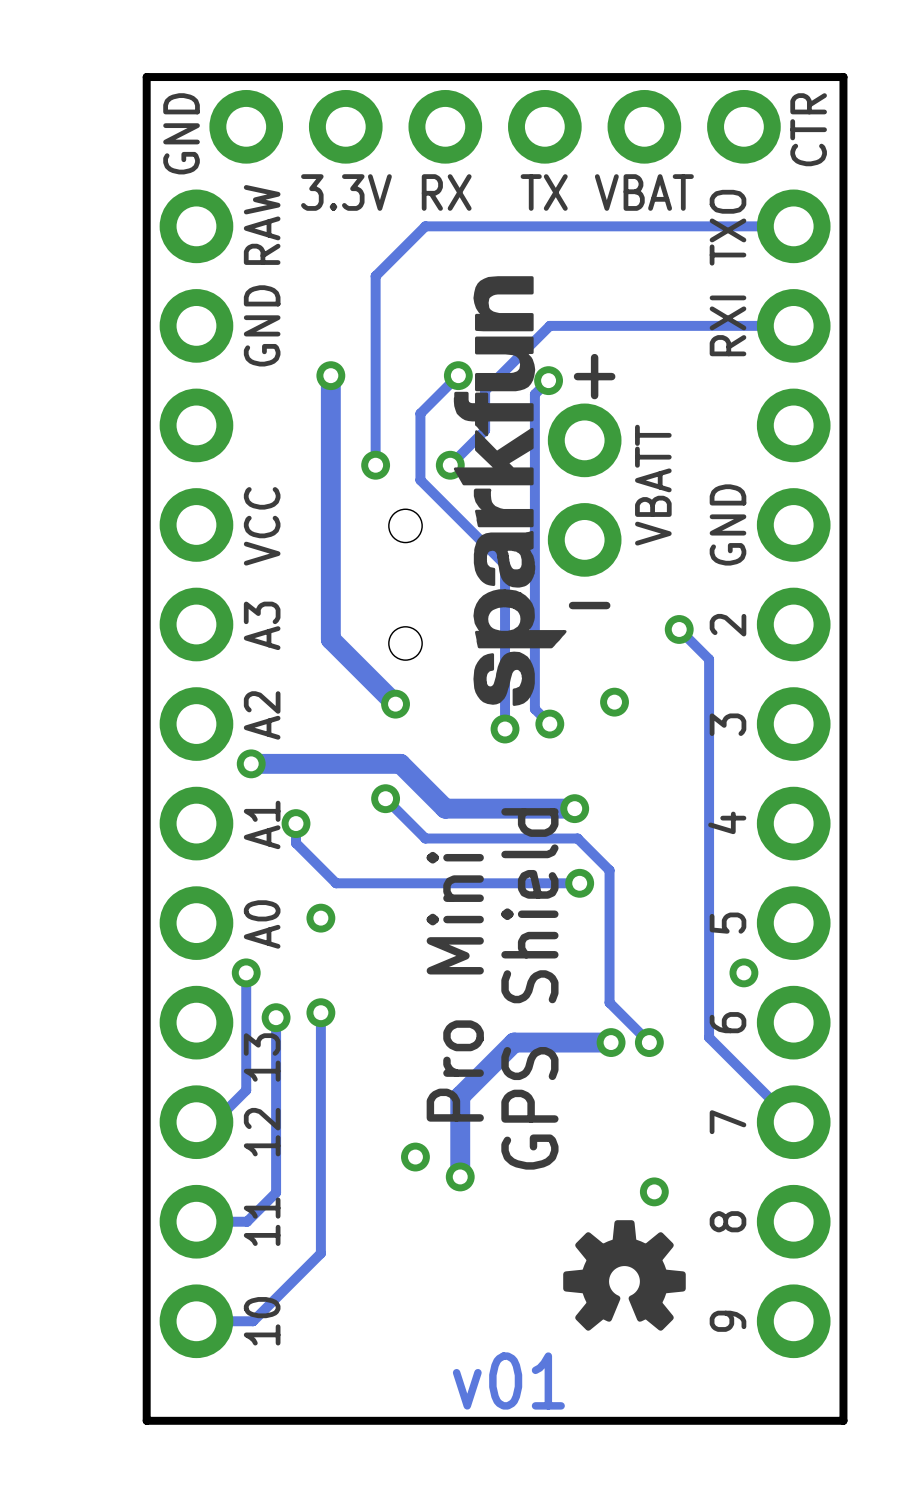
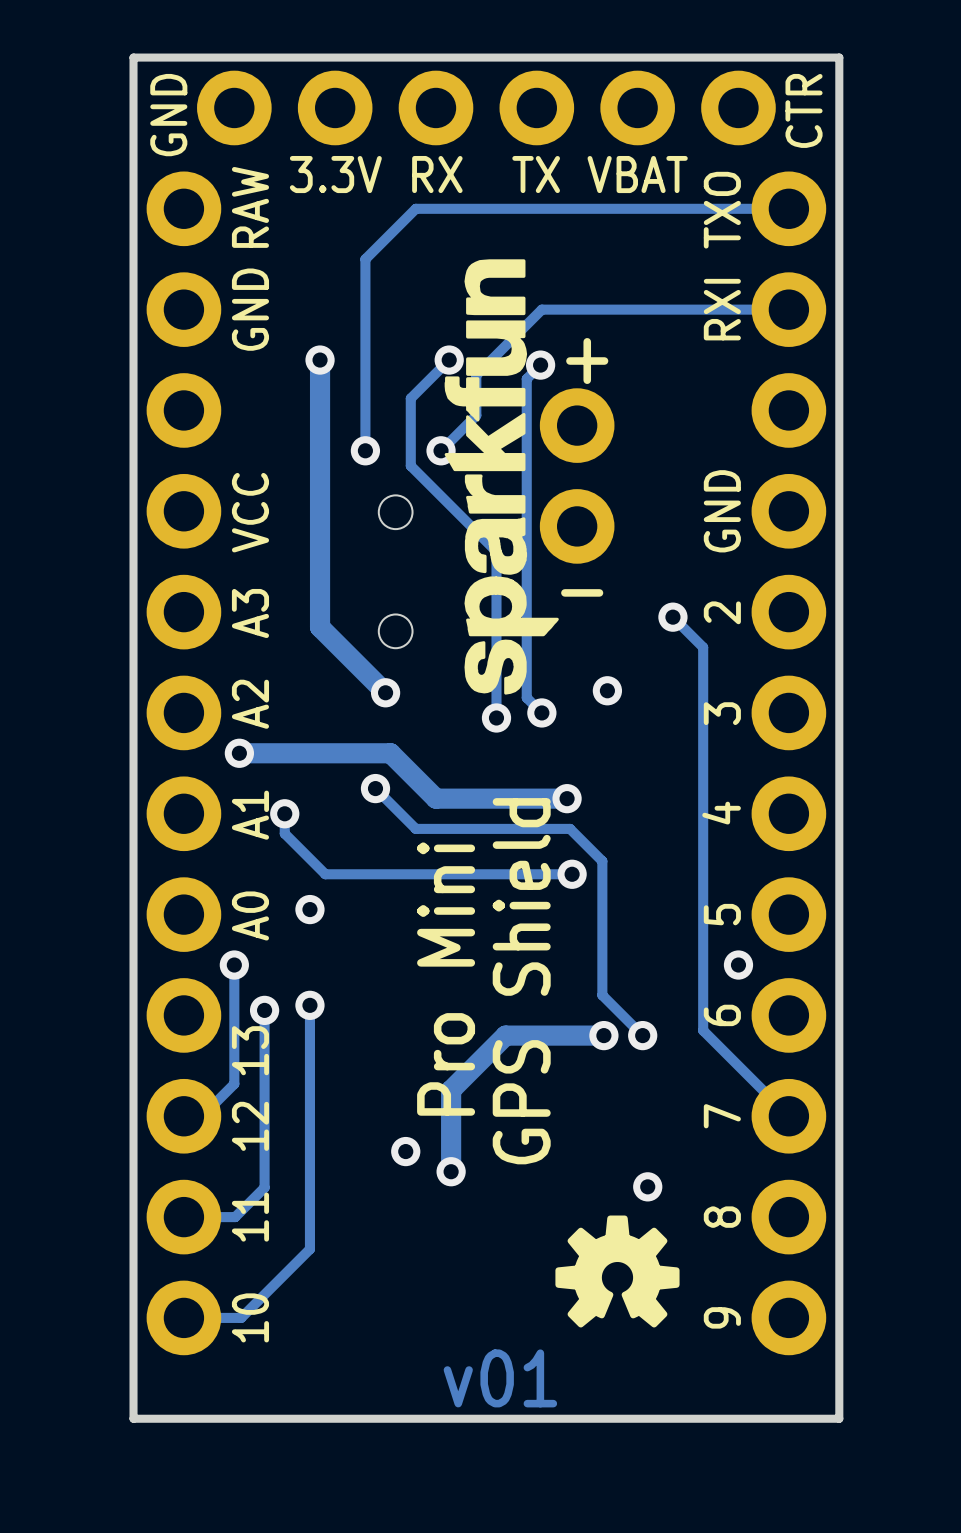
text: VBATT (653, 485) -> none

